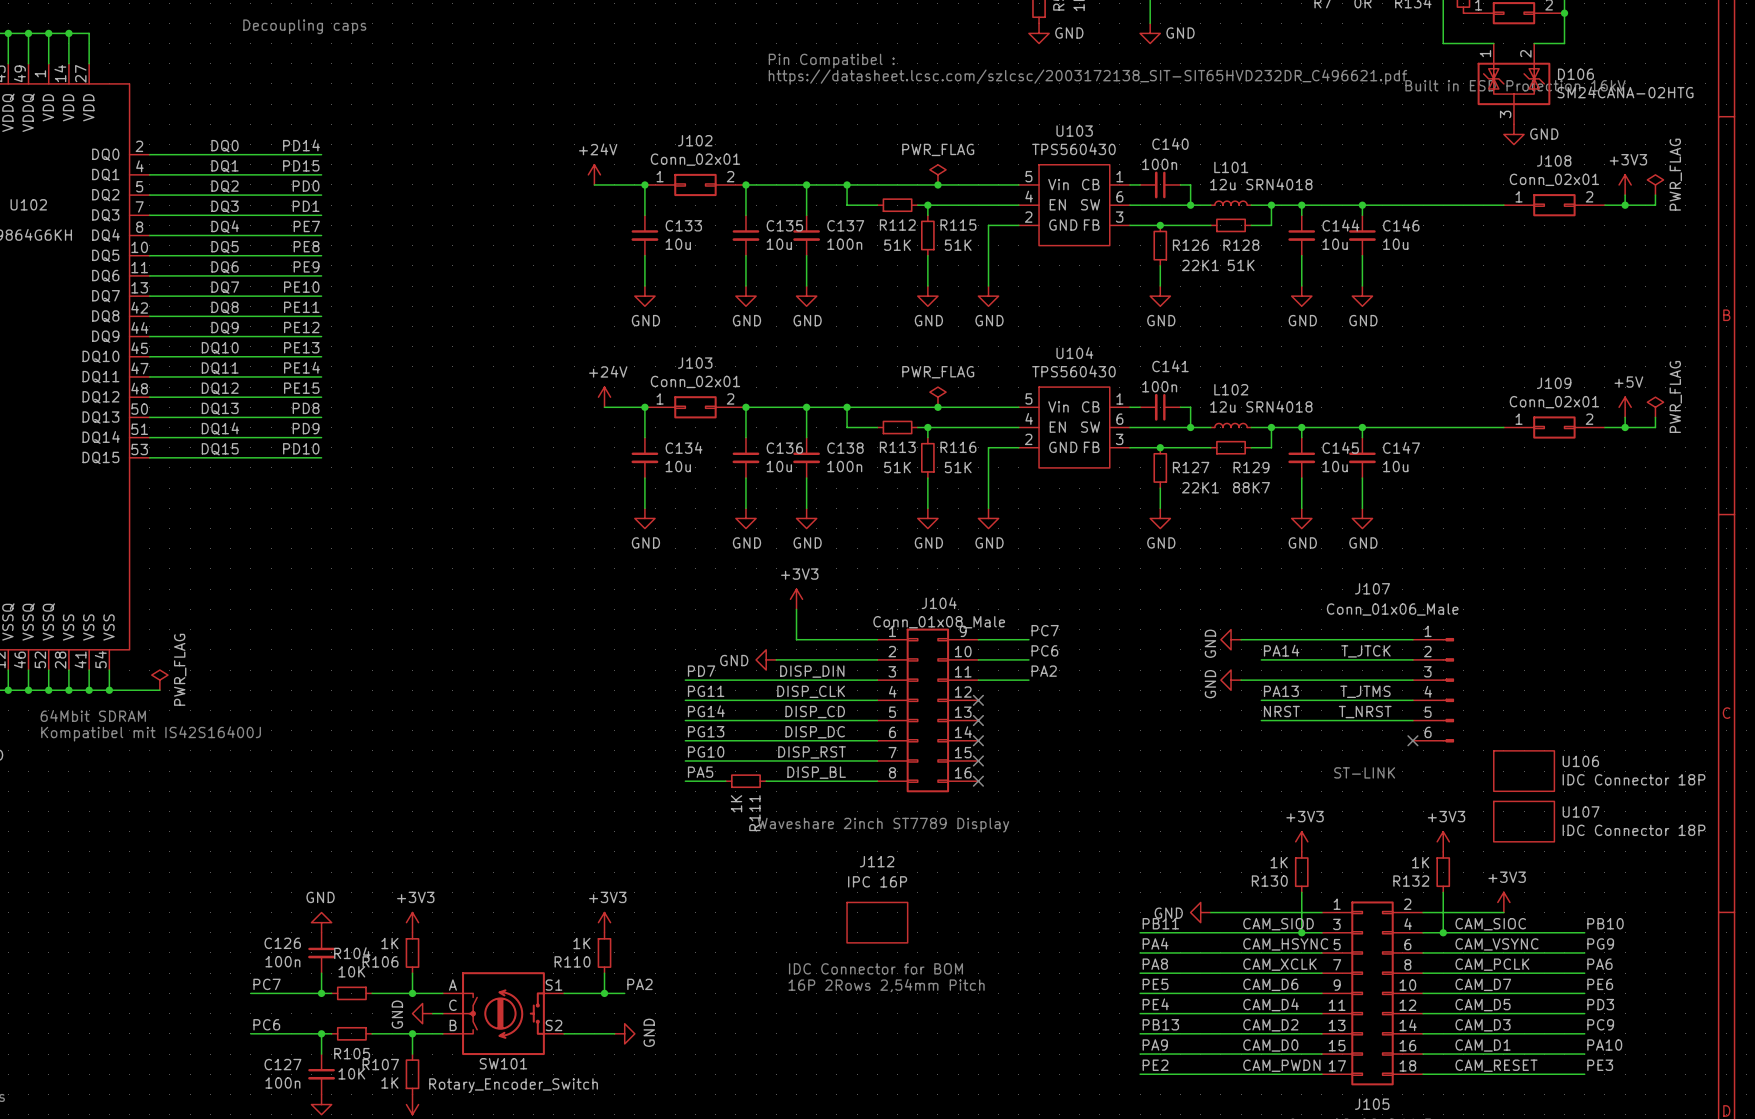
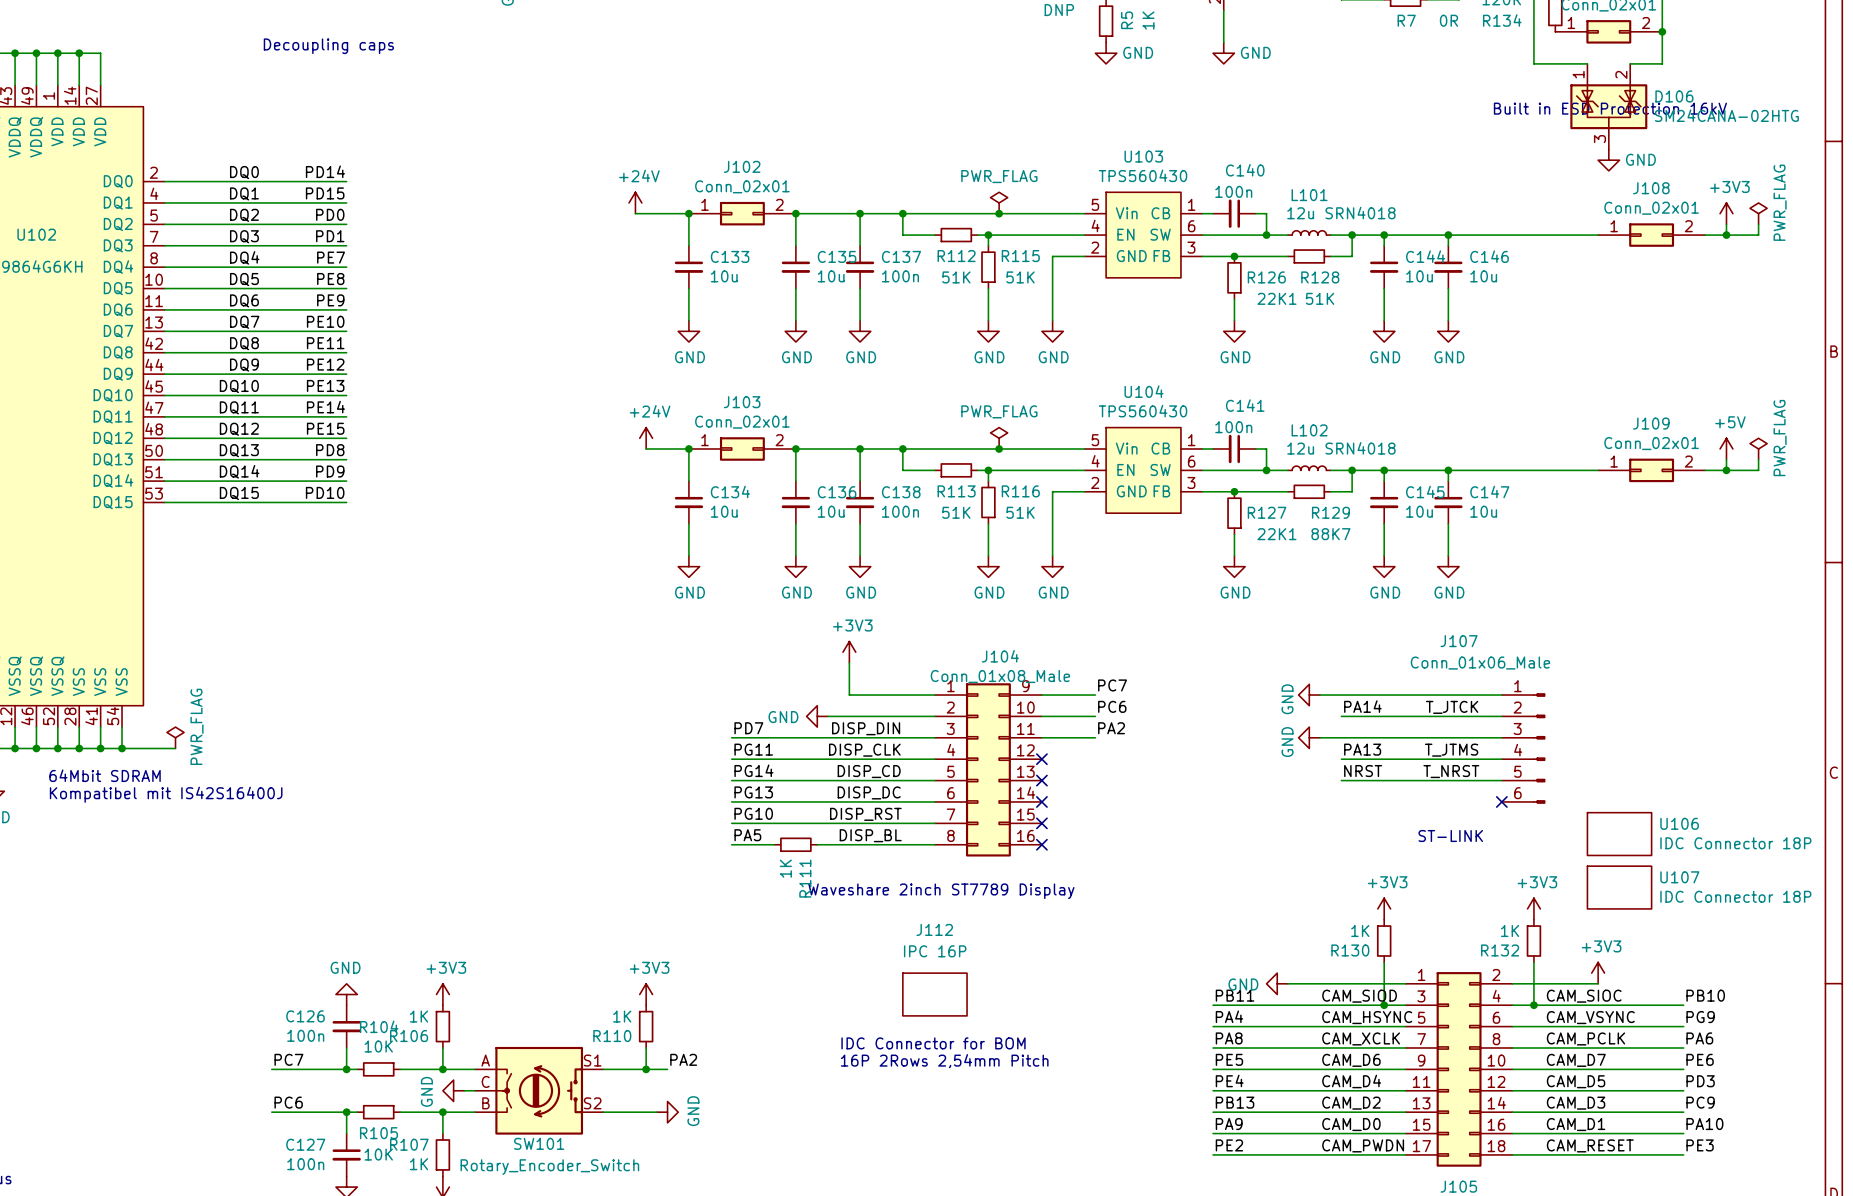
text: Pin Compatibel : (831, 61) -> none
text: https://datasheet.lcsc.com/szlcsc/2003172138_SIT-SIT65HVD232DR_C496621.pdf (1087, 77) -> none

